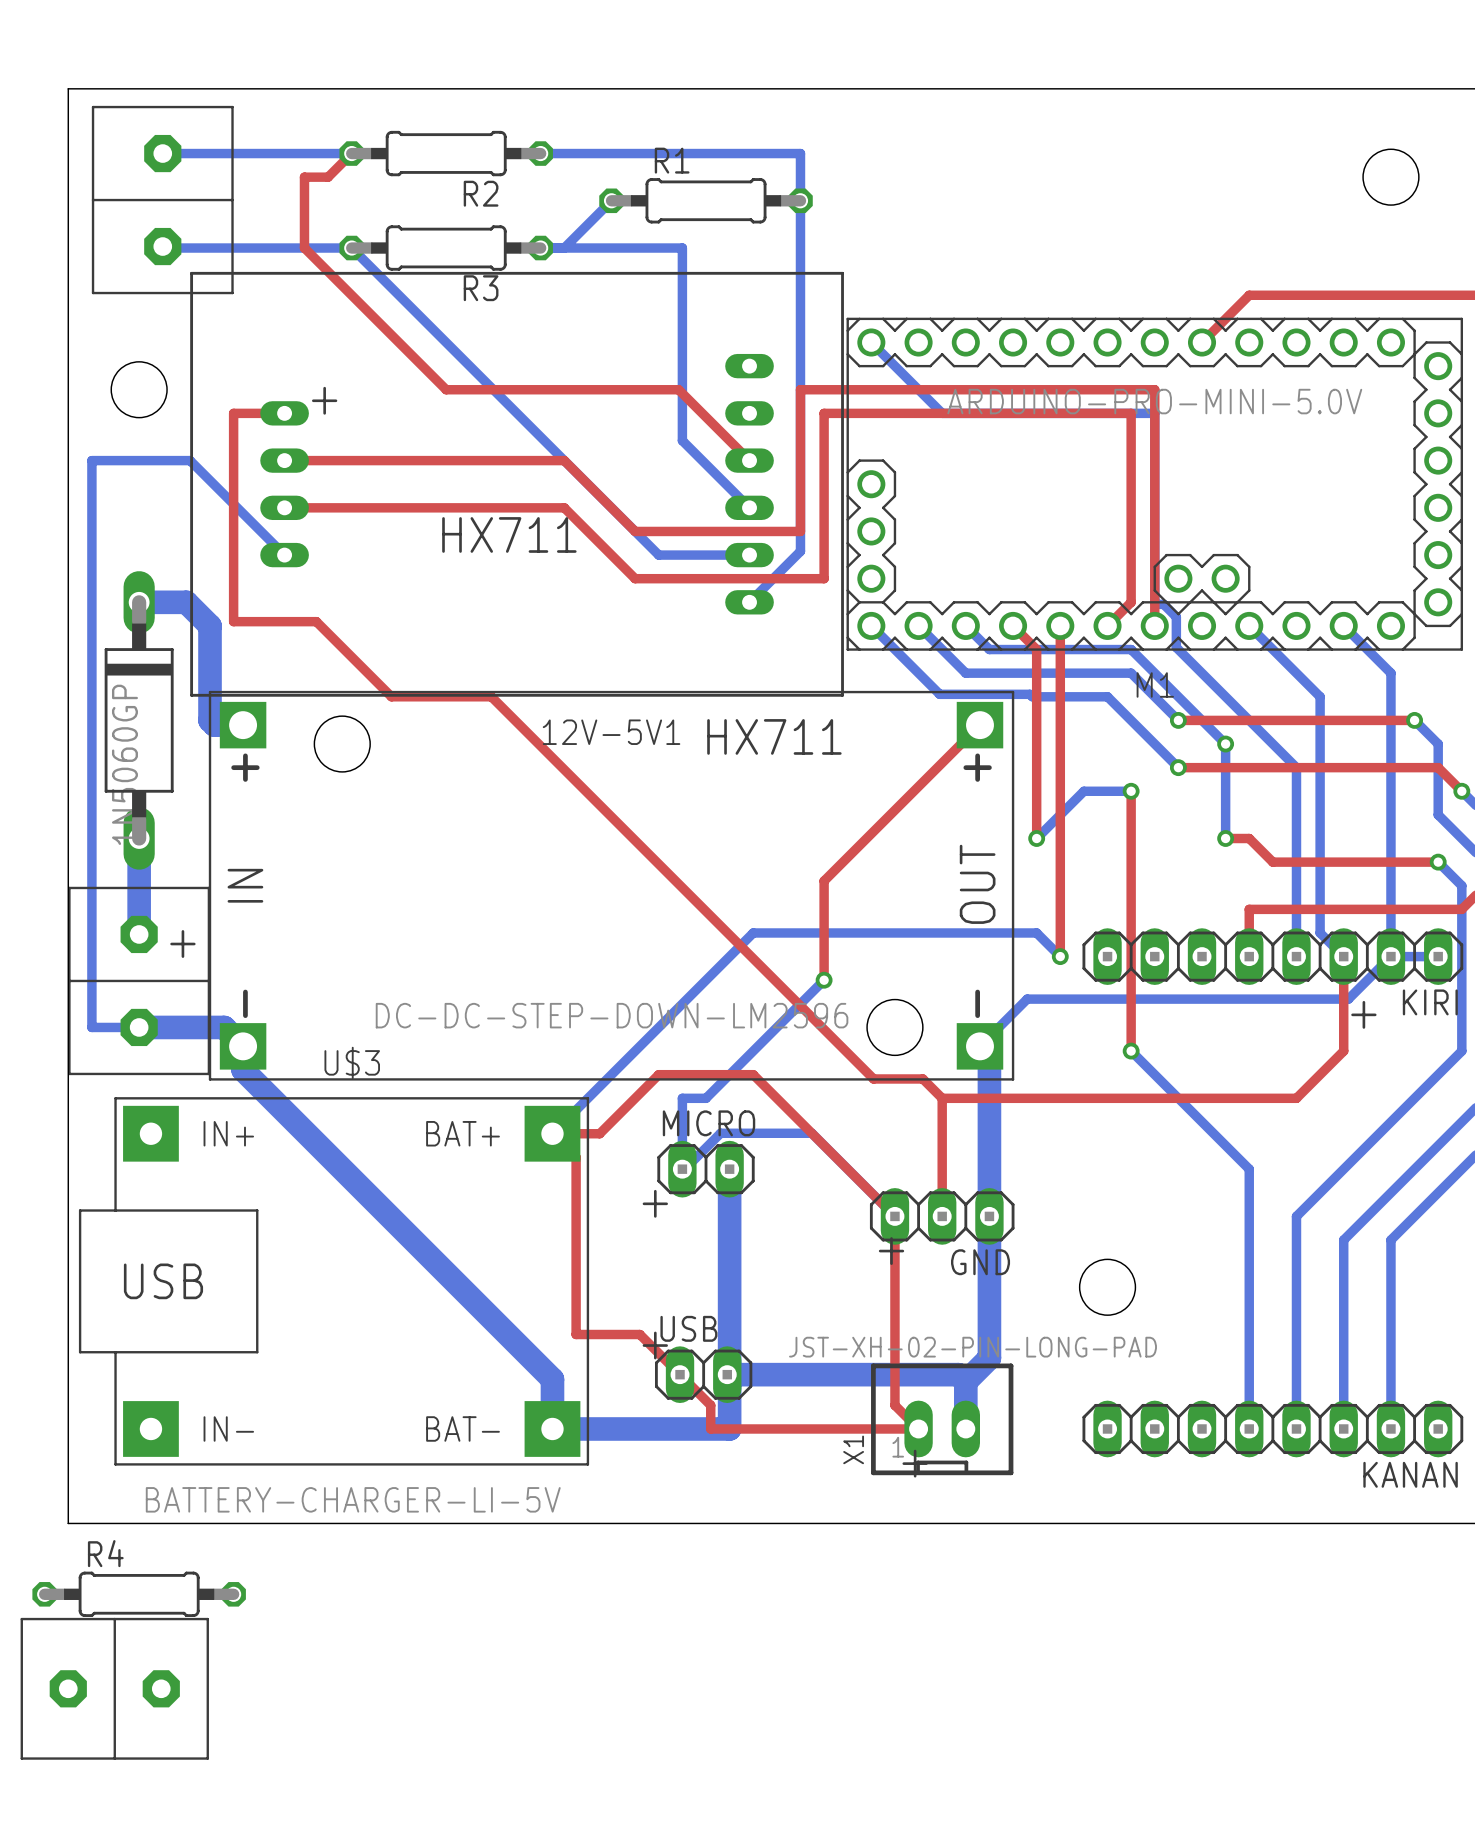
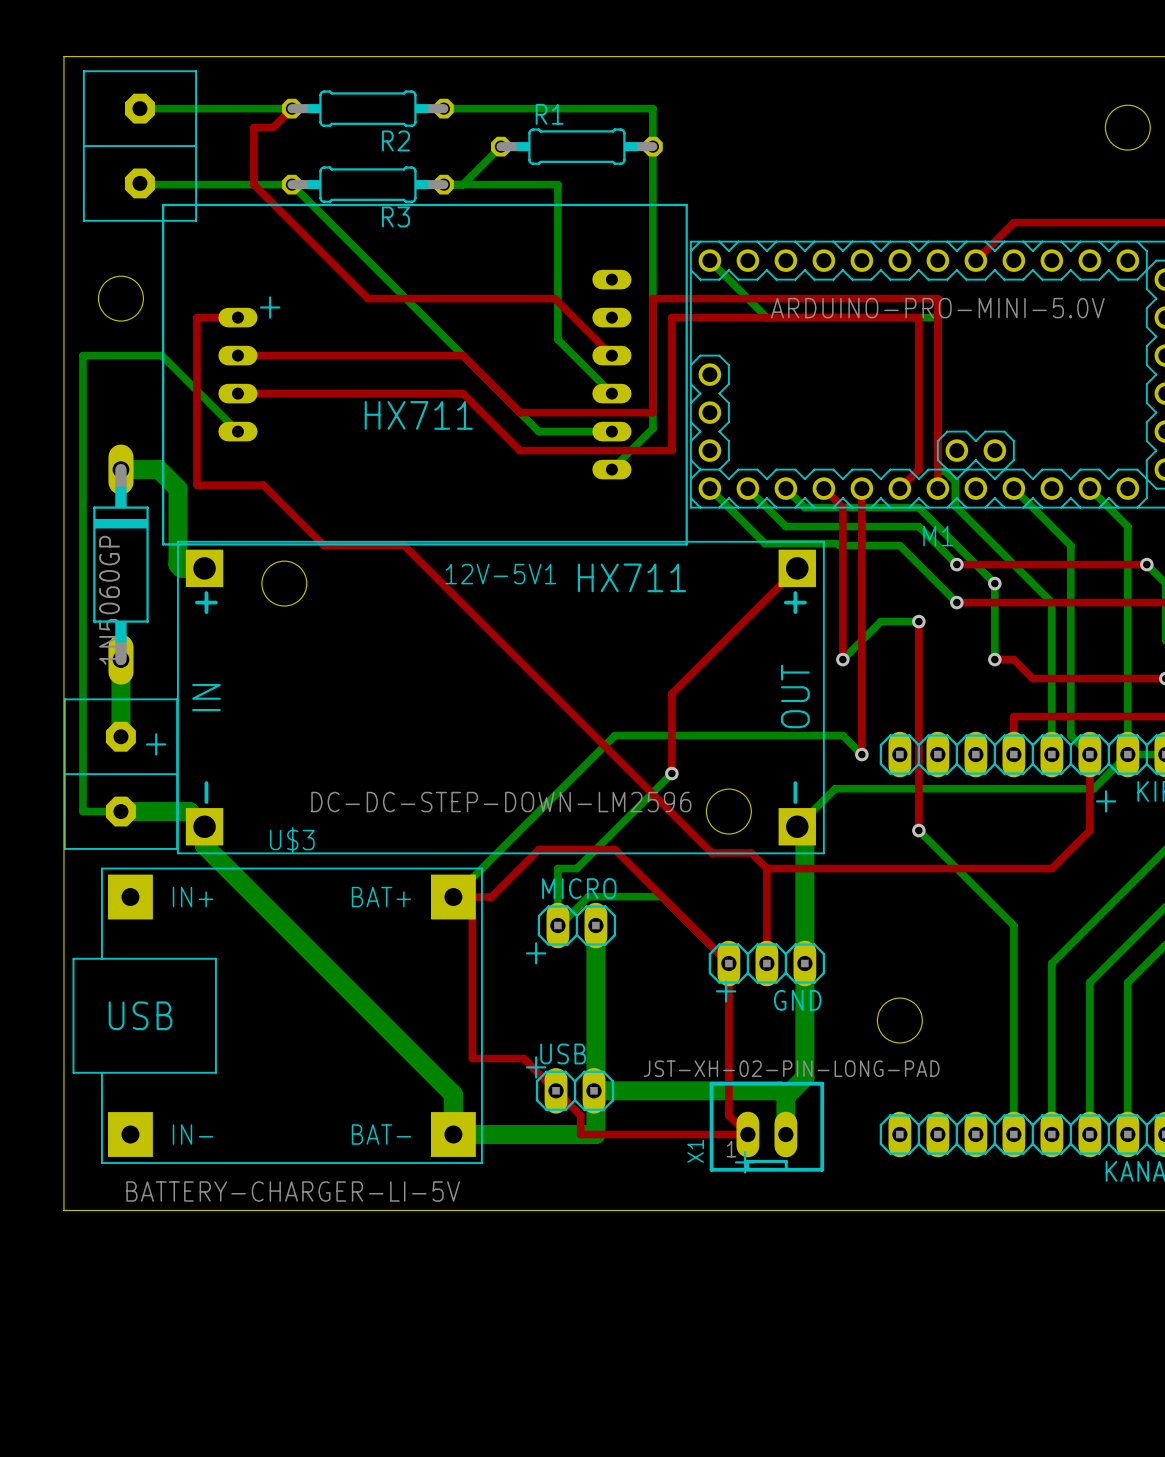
R4: (139, 1594) -> none
part: (114, 1688) -> none

